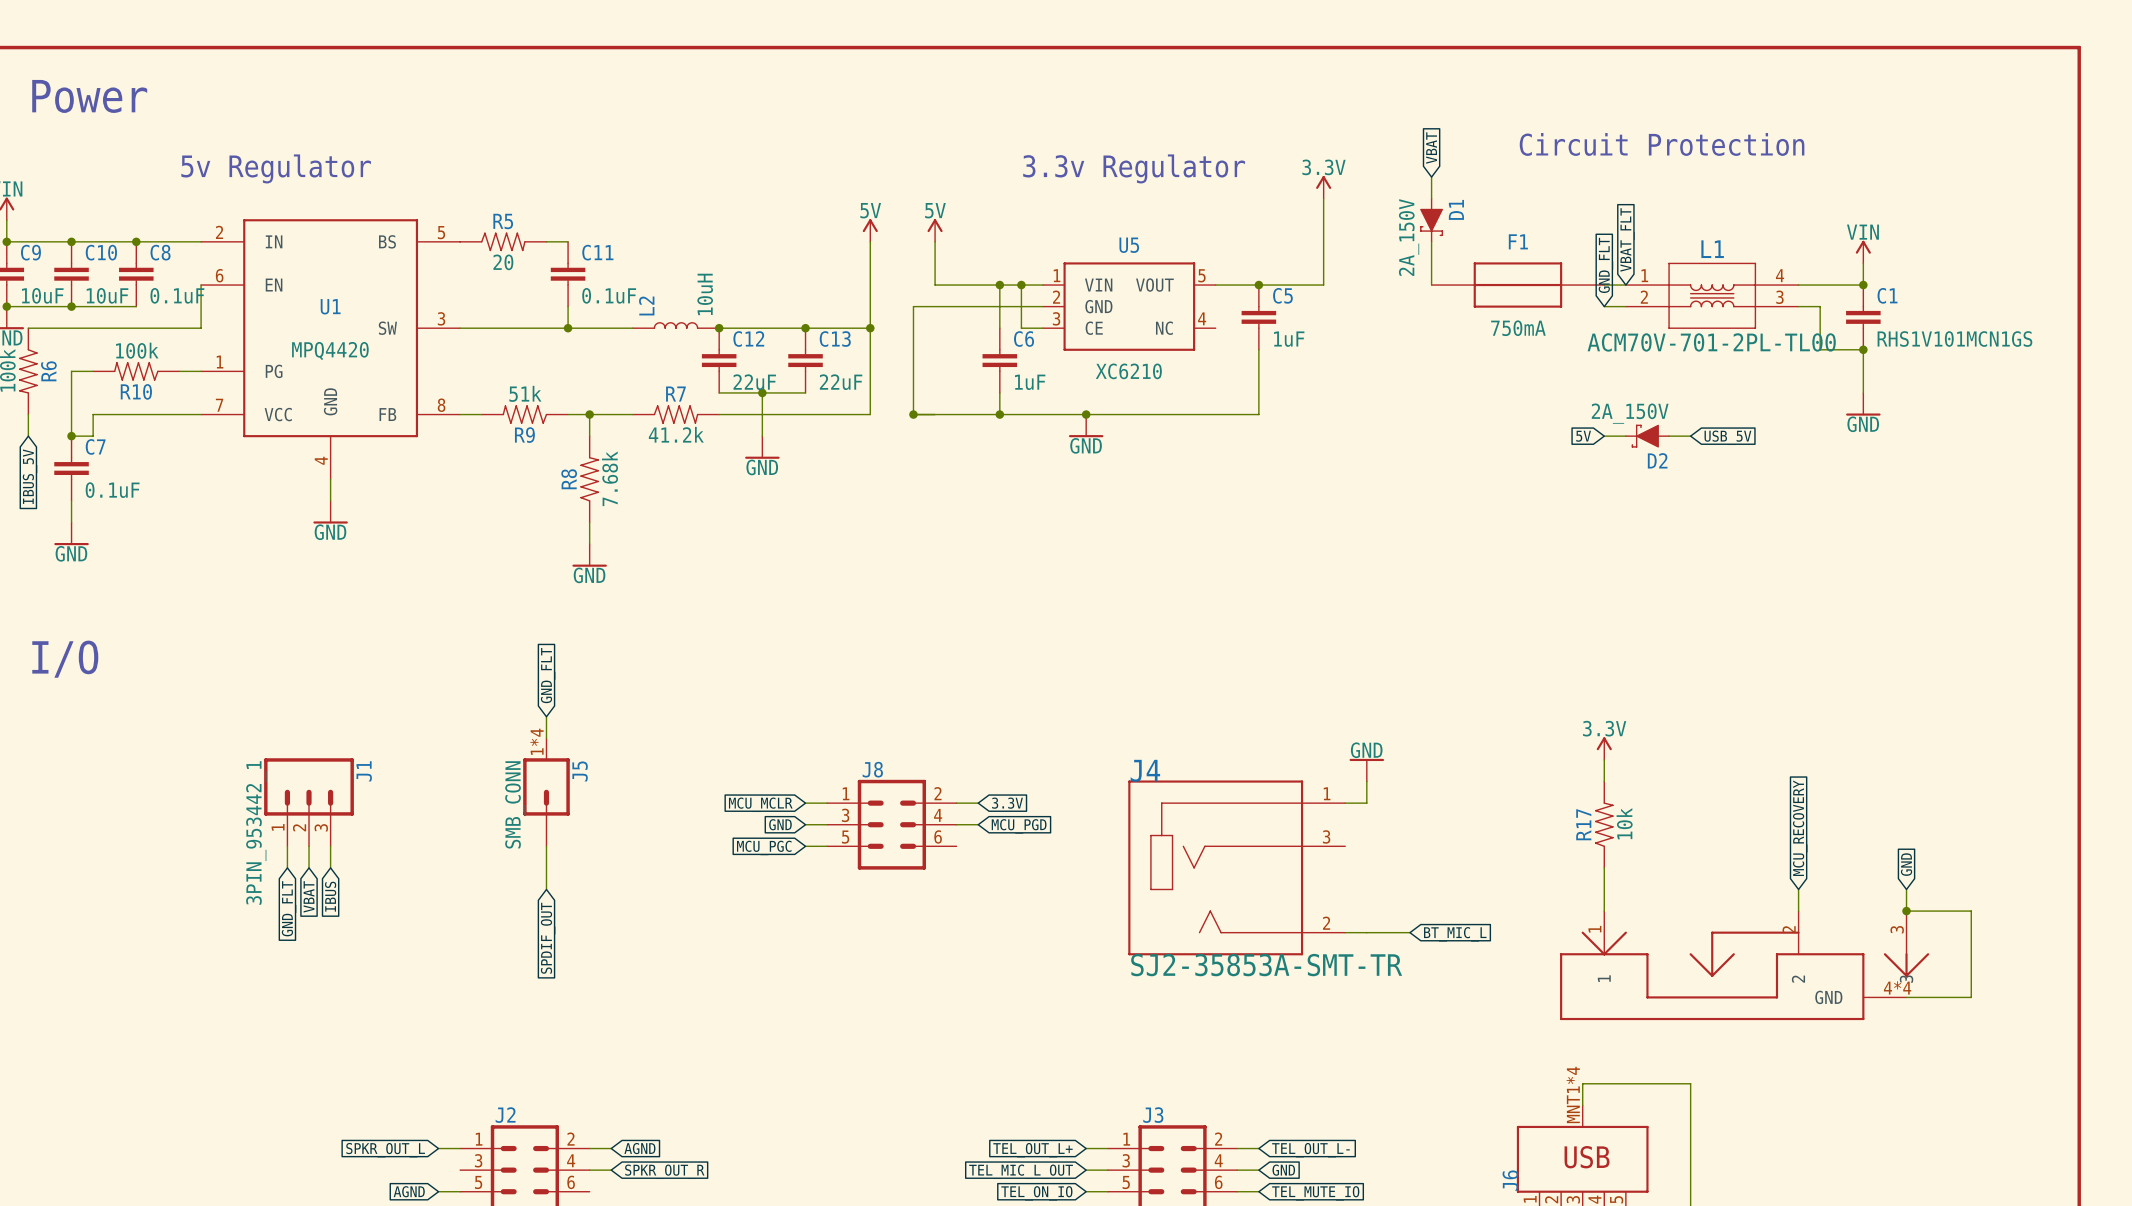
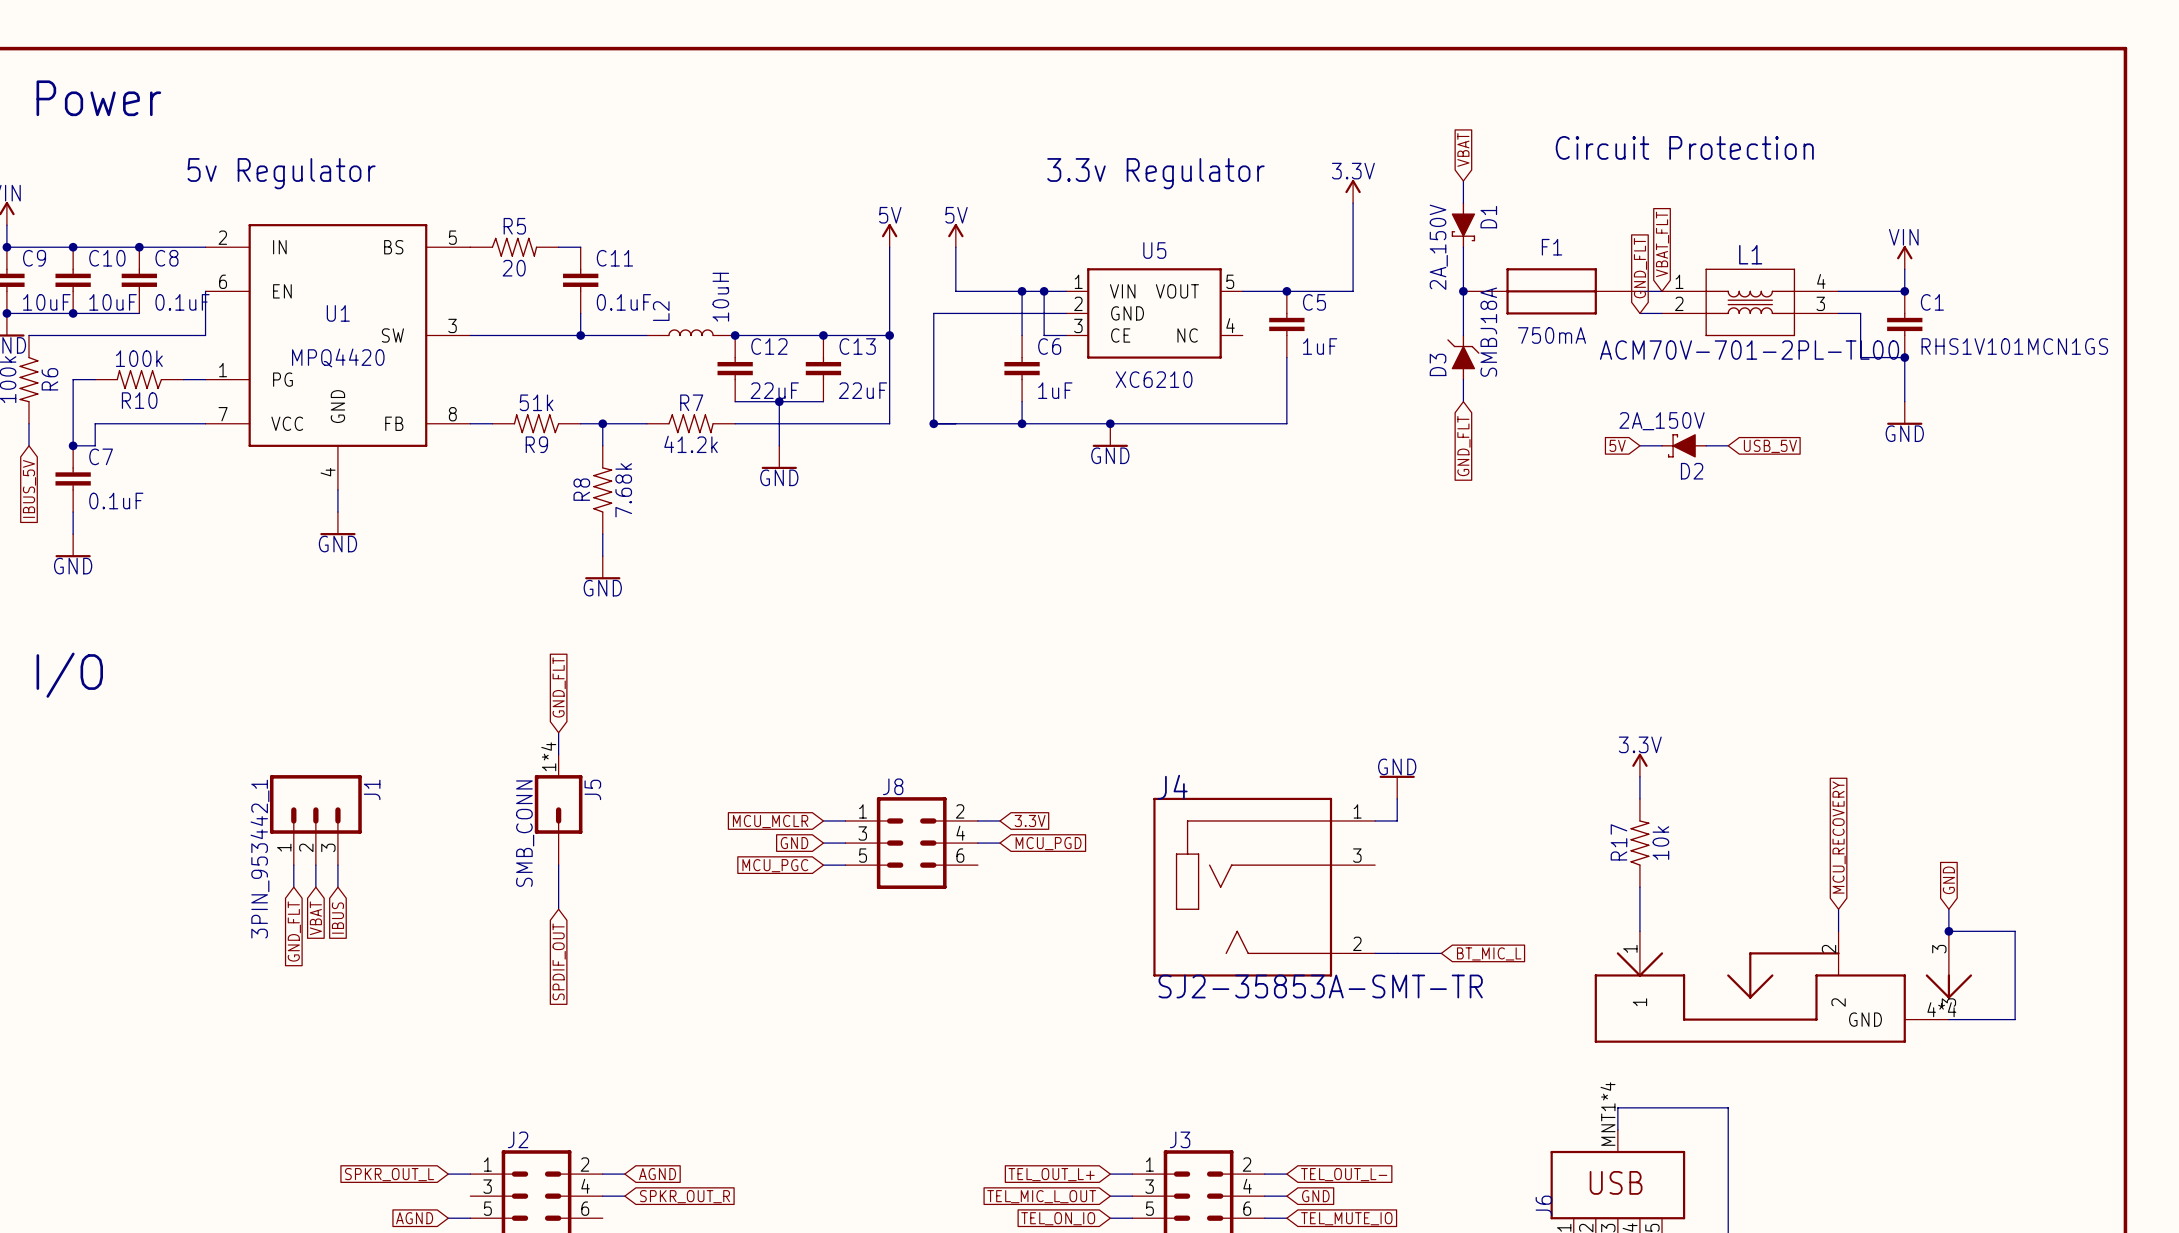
wire: none -> (1463, 291) (1463, 335)
junction: none -> (1463, 291)
D3: none -> SMBJ18A (1463, 357)
wire: none -> (1463, 379) (1463, 401)
global label: none -> GND_FLT (1463, 446)

